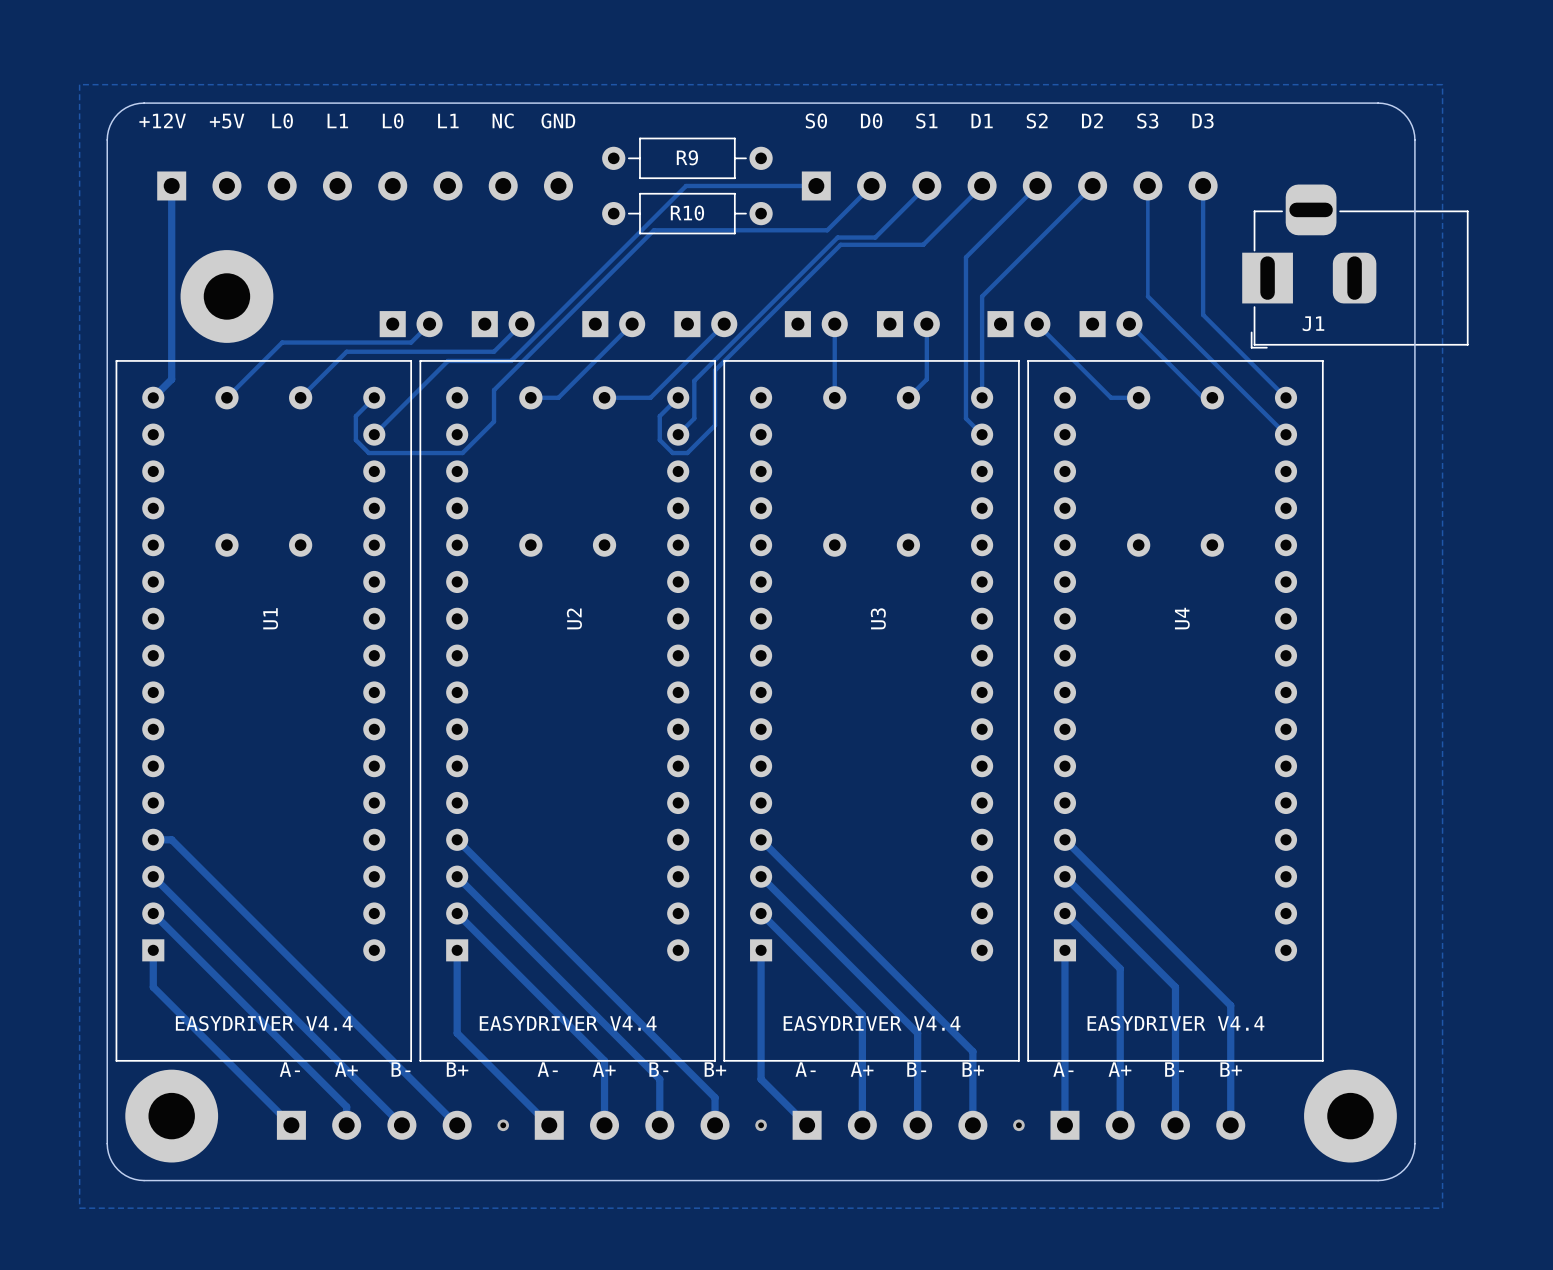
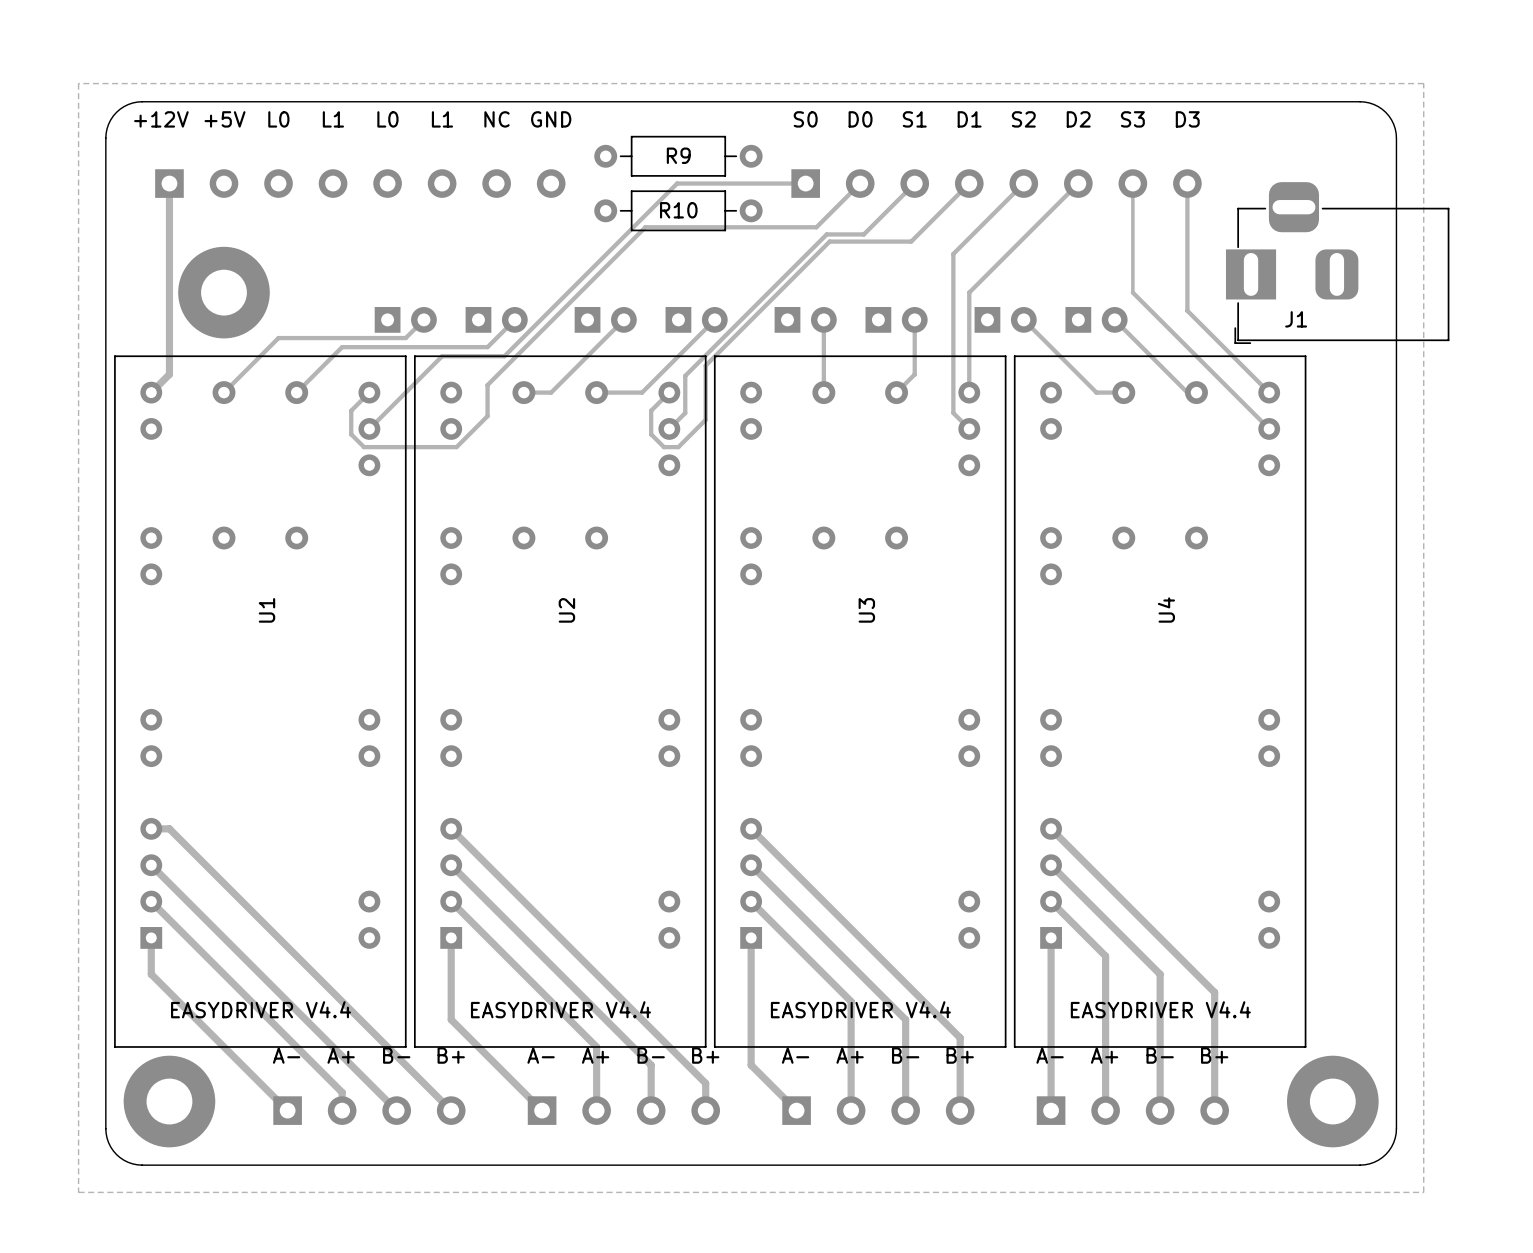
U1 footprint: [115, 360, 413, 1062] -> [114, 355, 407, 1048]
U2 footprint: [419, 360, 716, 1062] -> [414, 355, 707, 1048]
U3 footprint: [723, 360, 1020, 1062] -> [713, 355, 1007, 1048]
U4 footprint: [1027, 360, 1324, 1062] -> [1013, 355, 1307, 1048]
via: (503, 1125) -> none
via: (761, 1125) -> none
via: (1018, 1125) -> none

